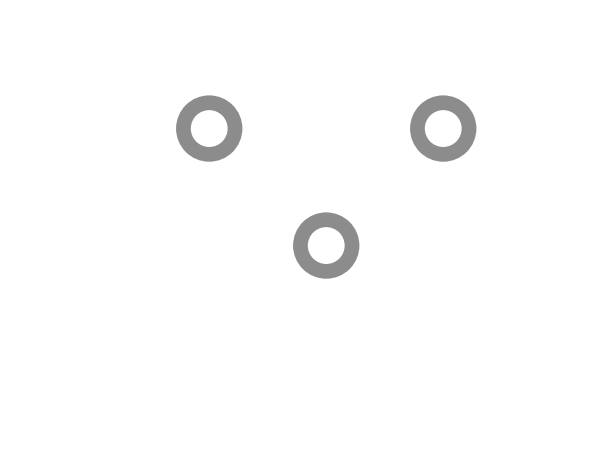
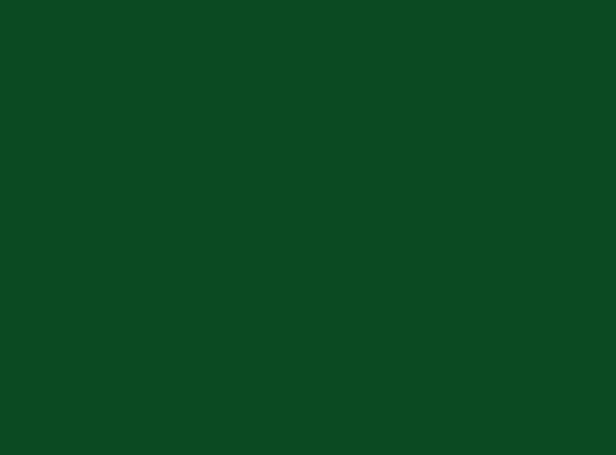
part: (326, 187) -> none

